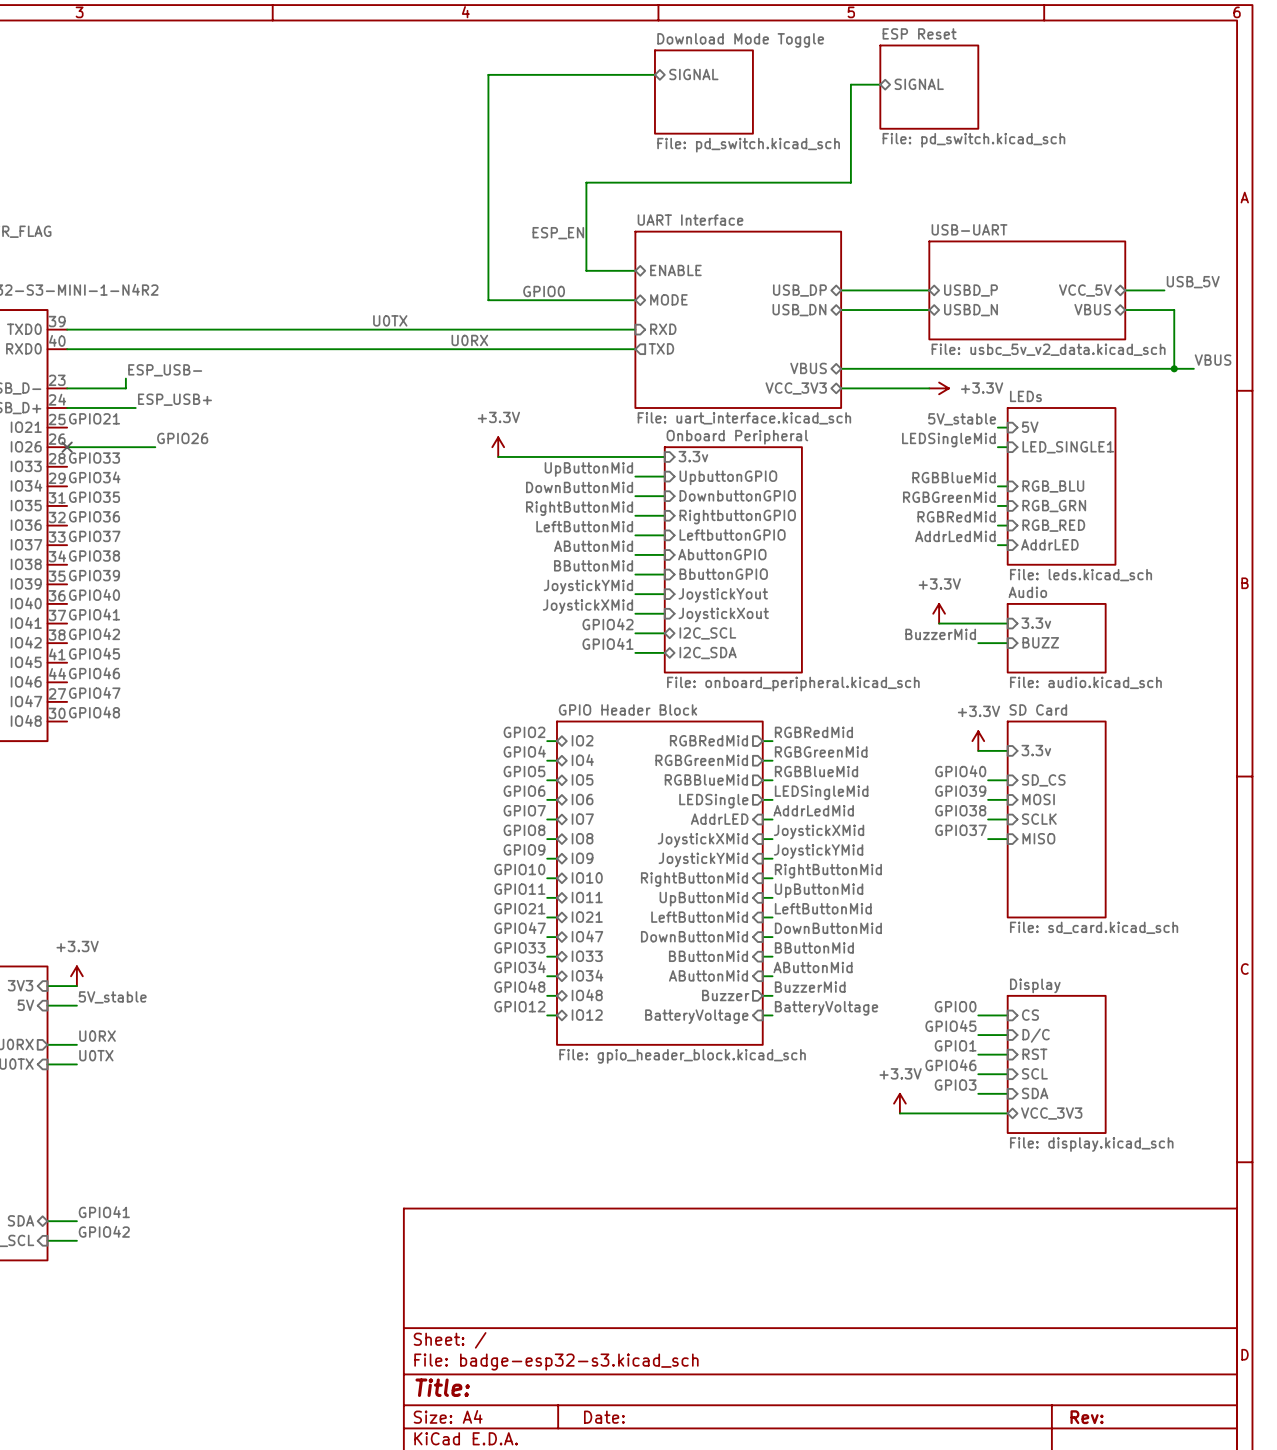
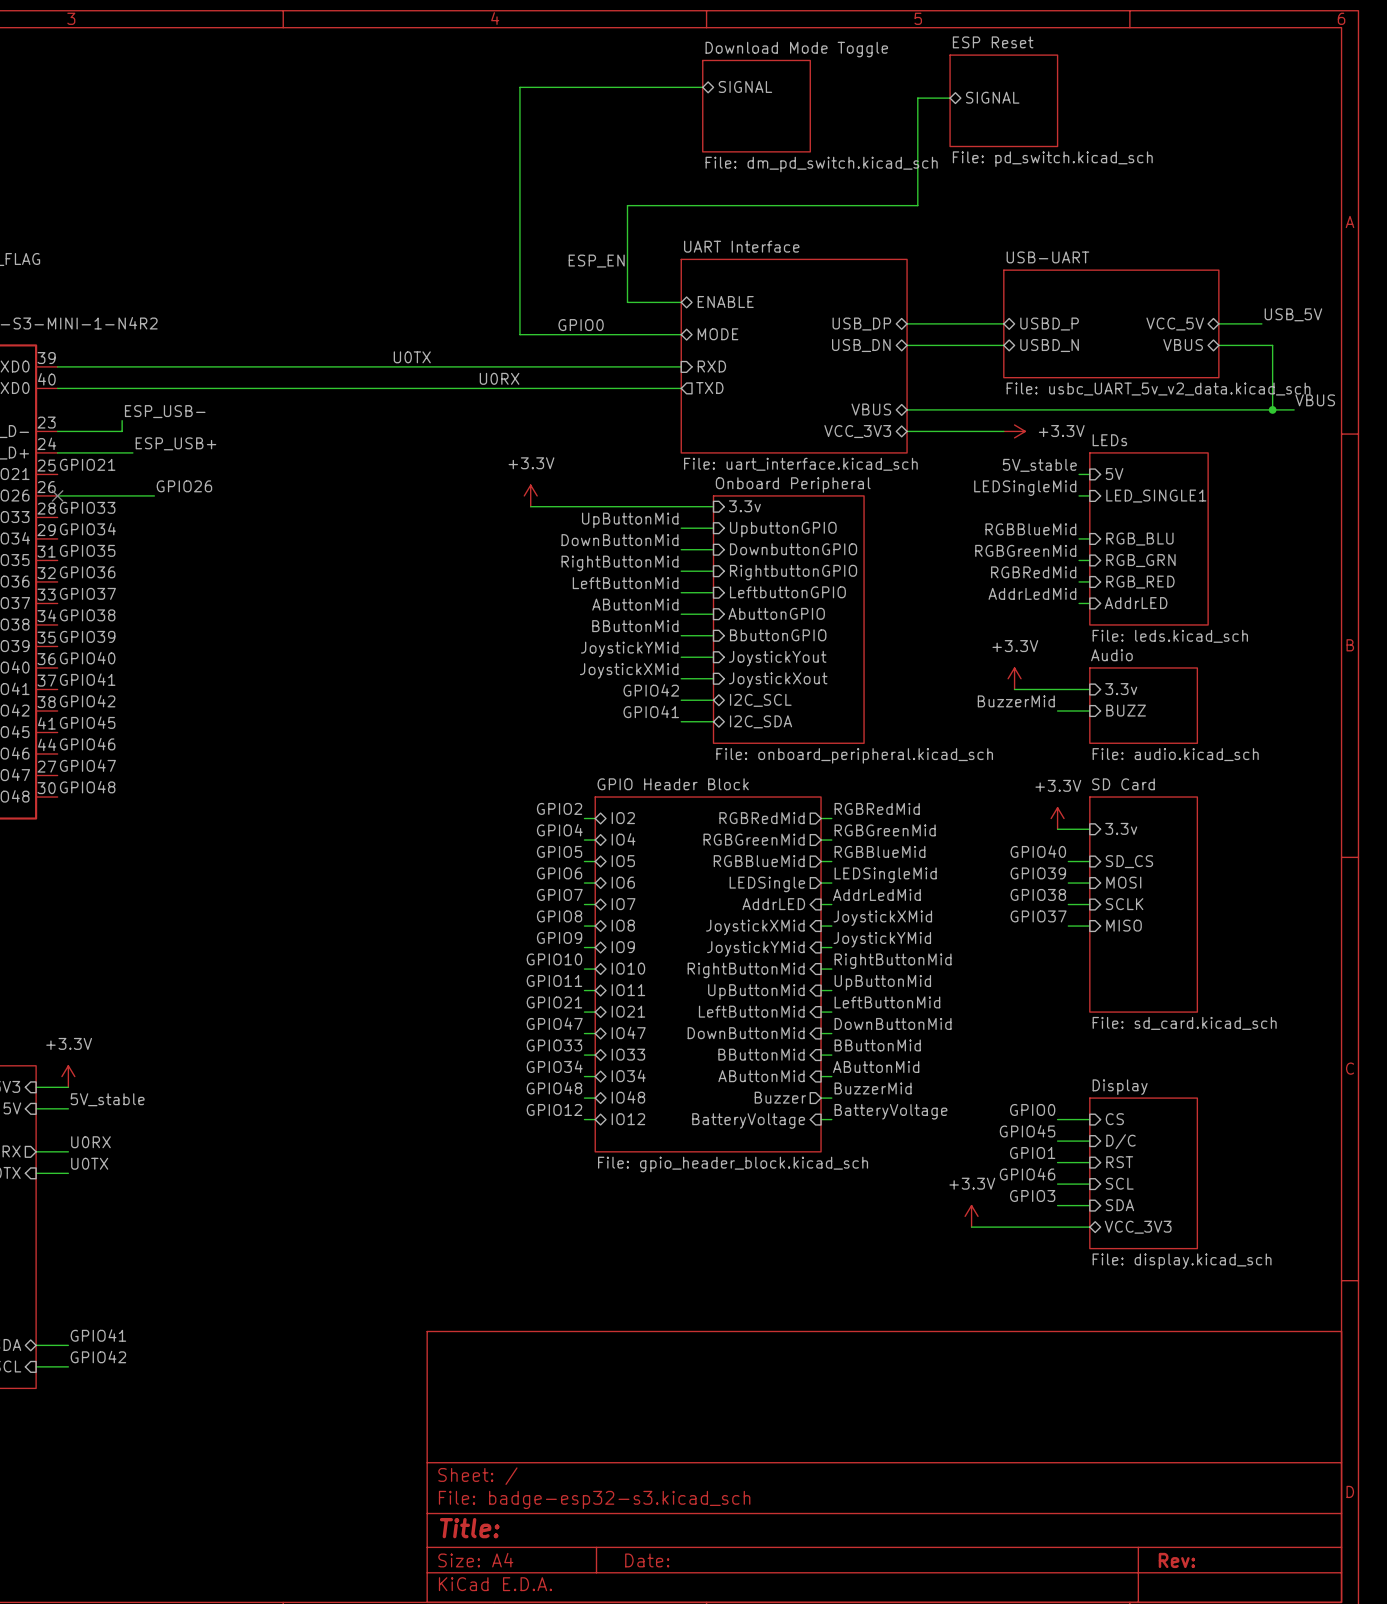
sheet Download Mode Toggle value: File: pd_switch.kicad_sch (748, 145) -> File: dm_pd_switch.kicad_sch (821, 164)
sheet USB-UART value: File: usbc_5v_v2_data.kicad_sch (1048, 349) -> File: usbc_UART_5v_v2_data.kicad_sch (1158, 389)

